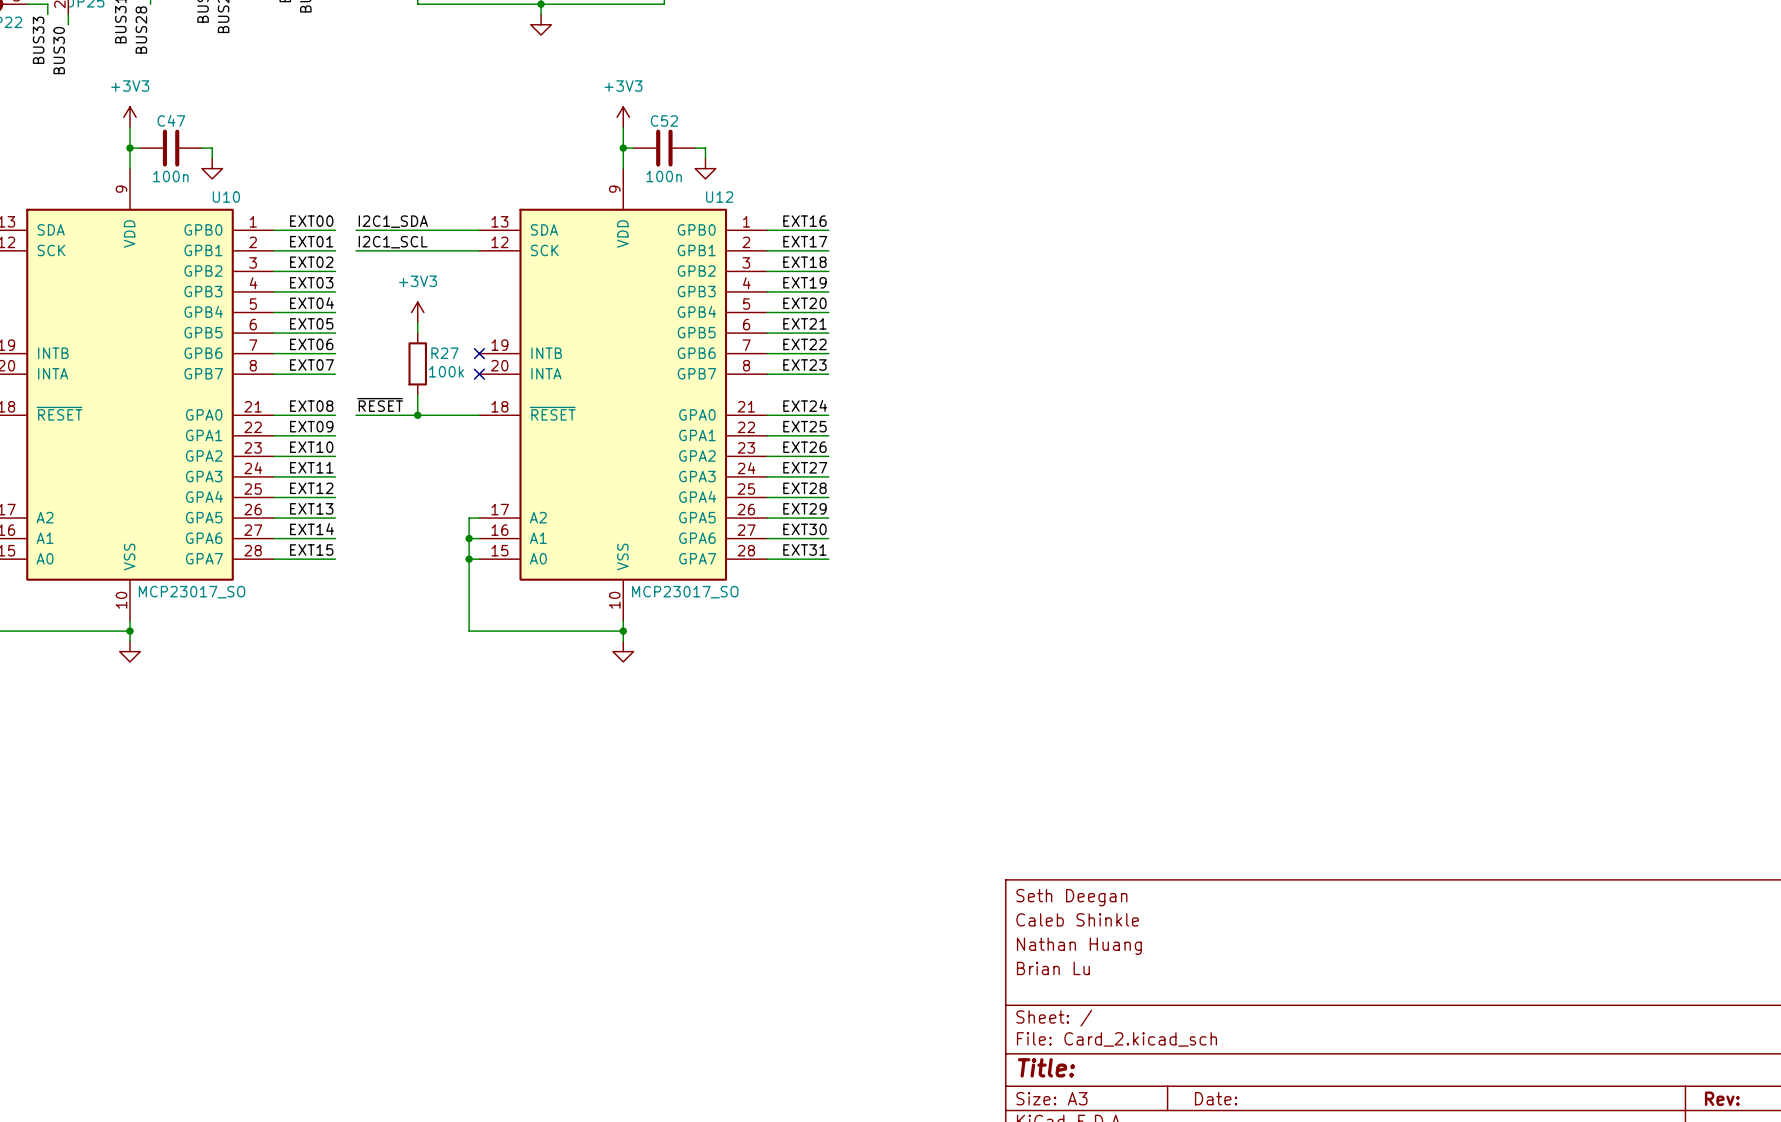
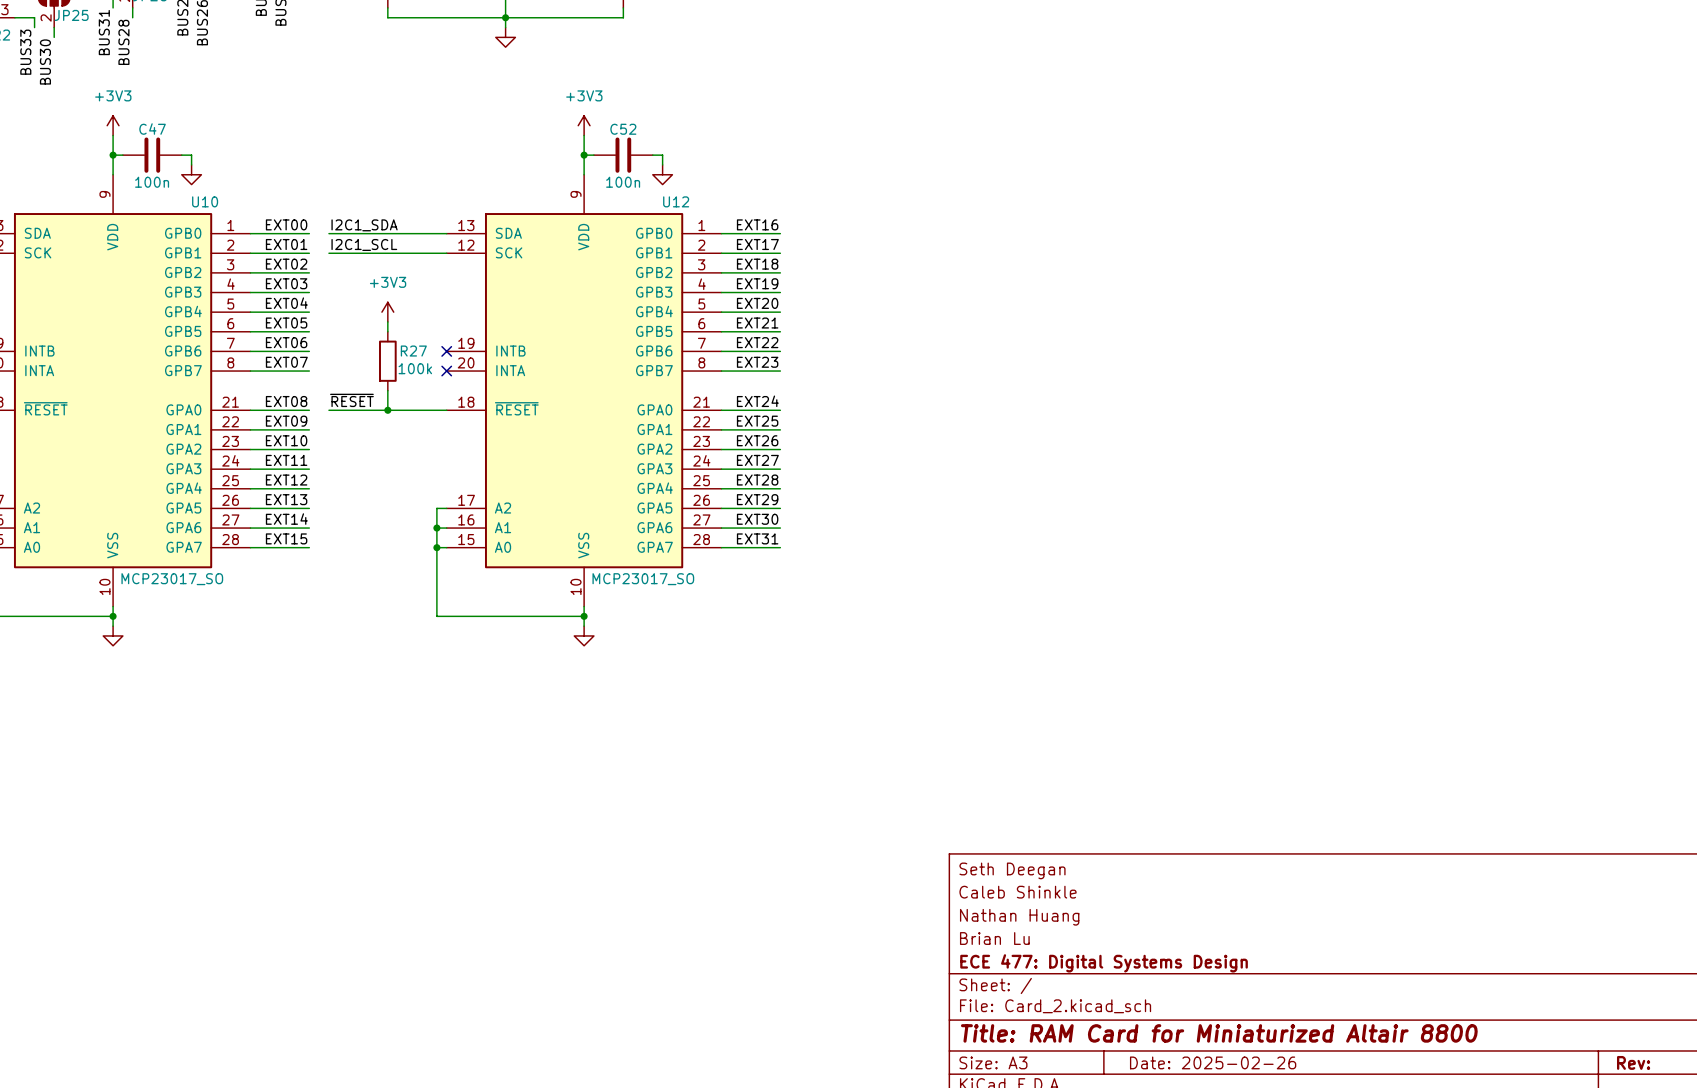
title block: none -> ECE 477: Digital Systems Design (1104, 963)
title block: Title: (1046, 1067) -> Title: RAM Card for Miniaturized Altair 8800 (1219, 1033)
title block: Date: (1216, 1098) -> Date: 2025-02-26 (1213, 1062)

